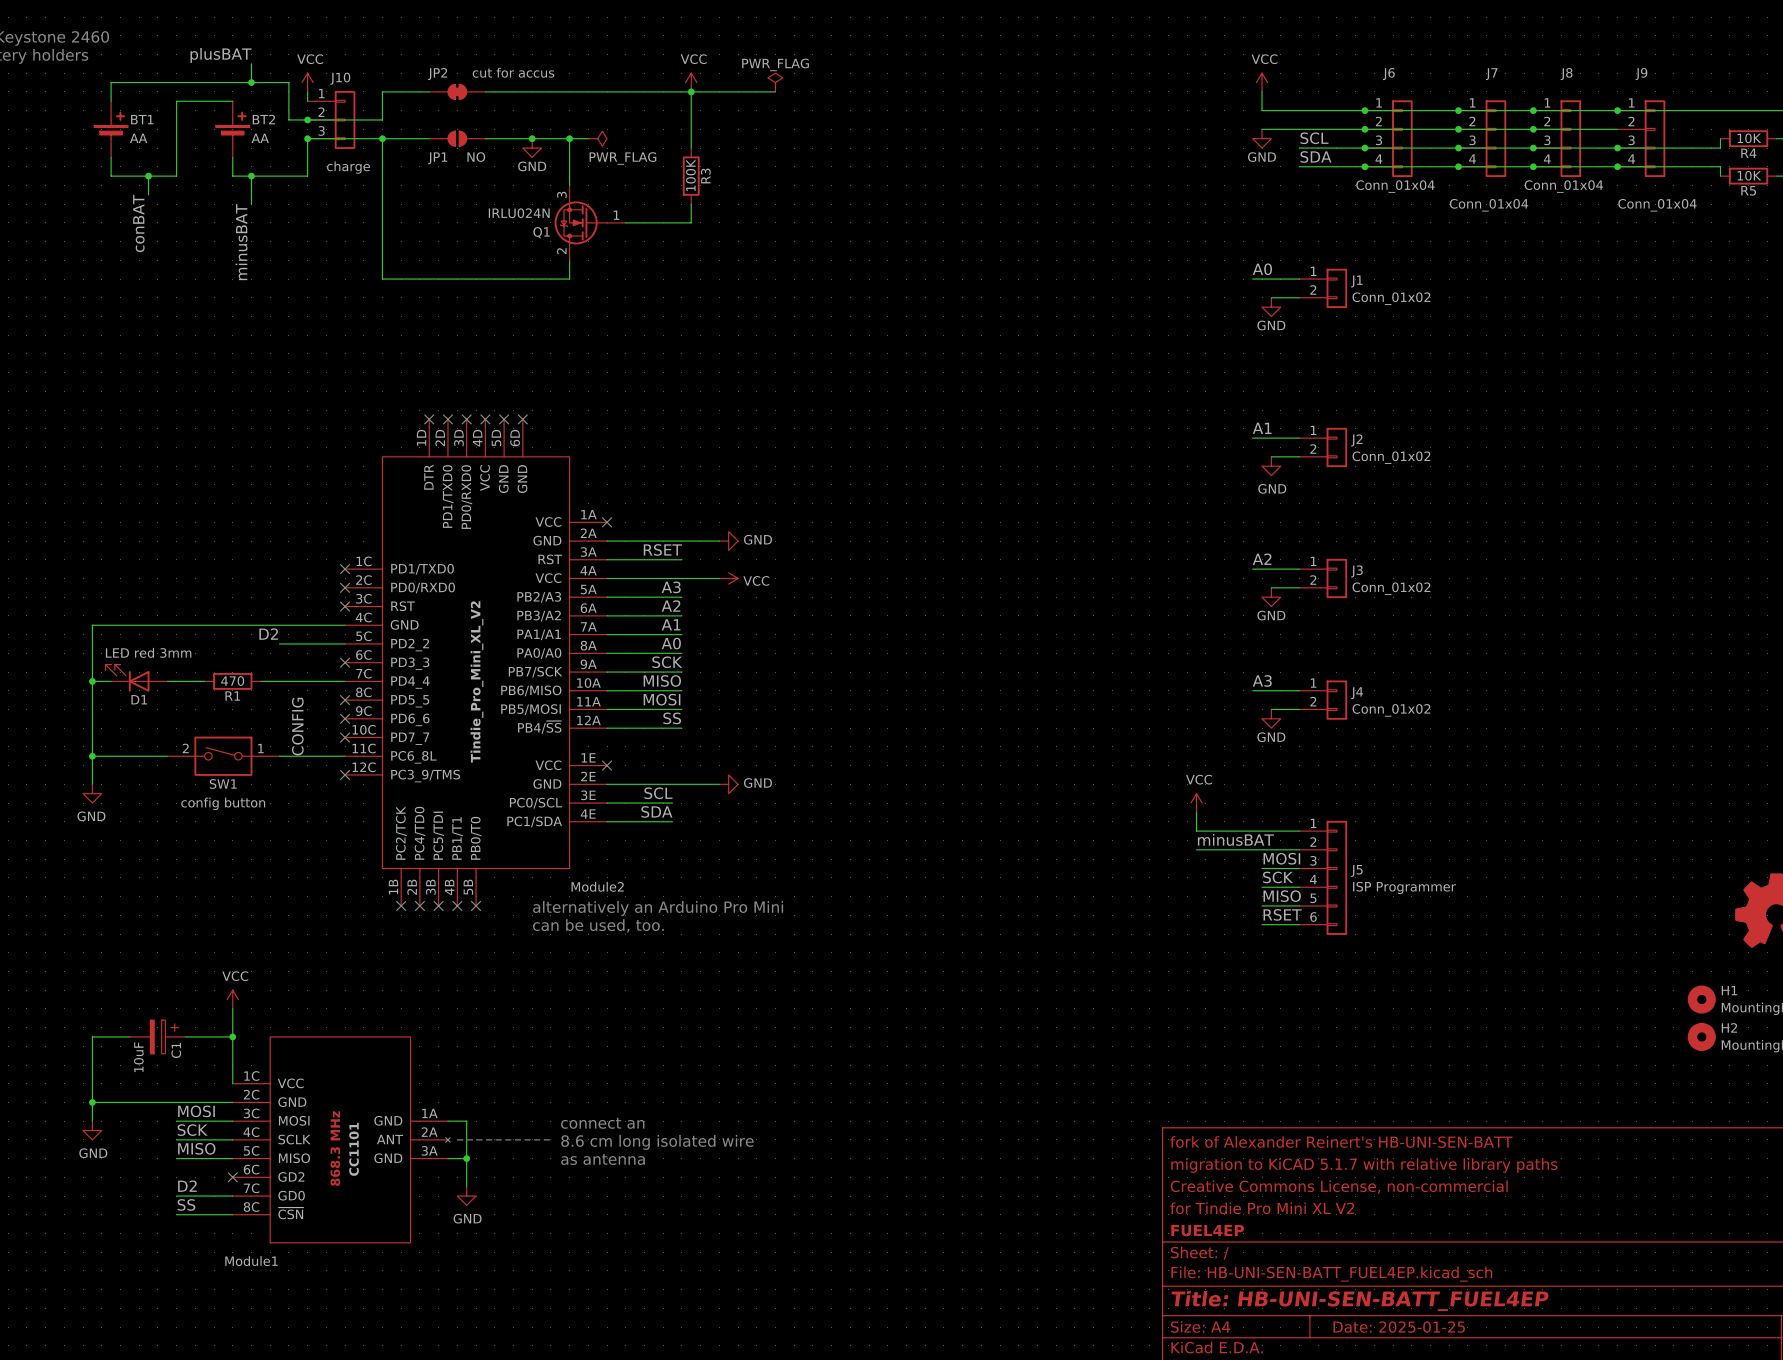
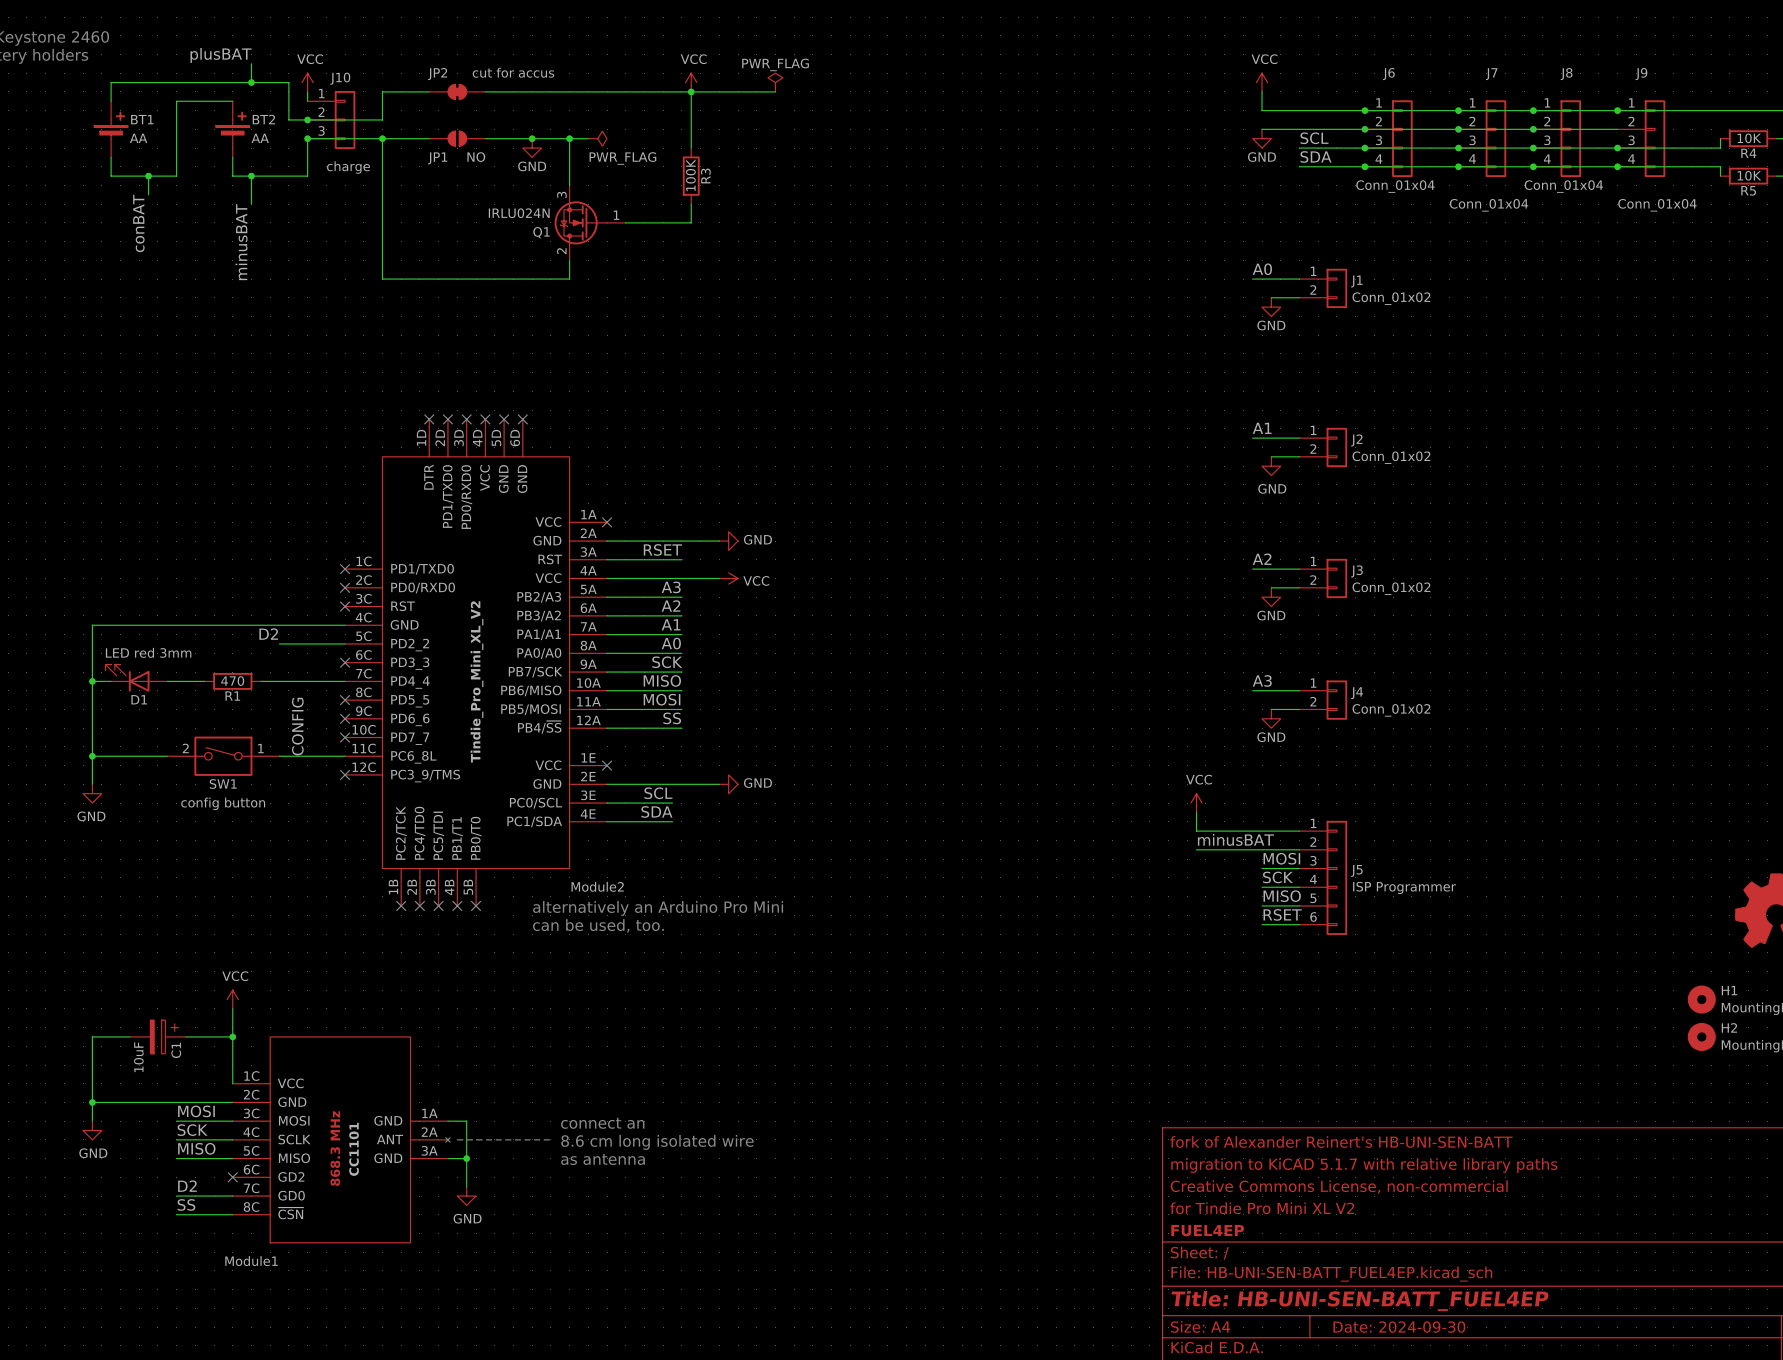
title block: Date: 2025-01-25 (1399, 1327) -> Date: 2024-09-30 (1399, 1327)

